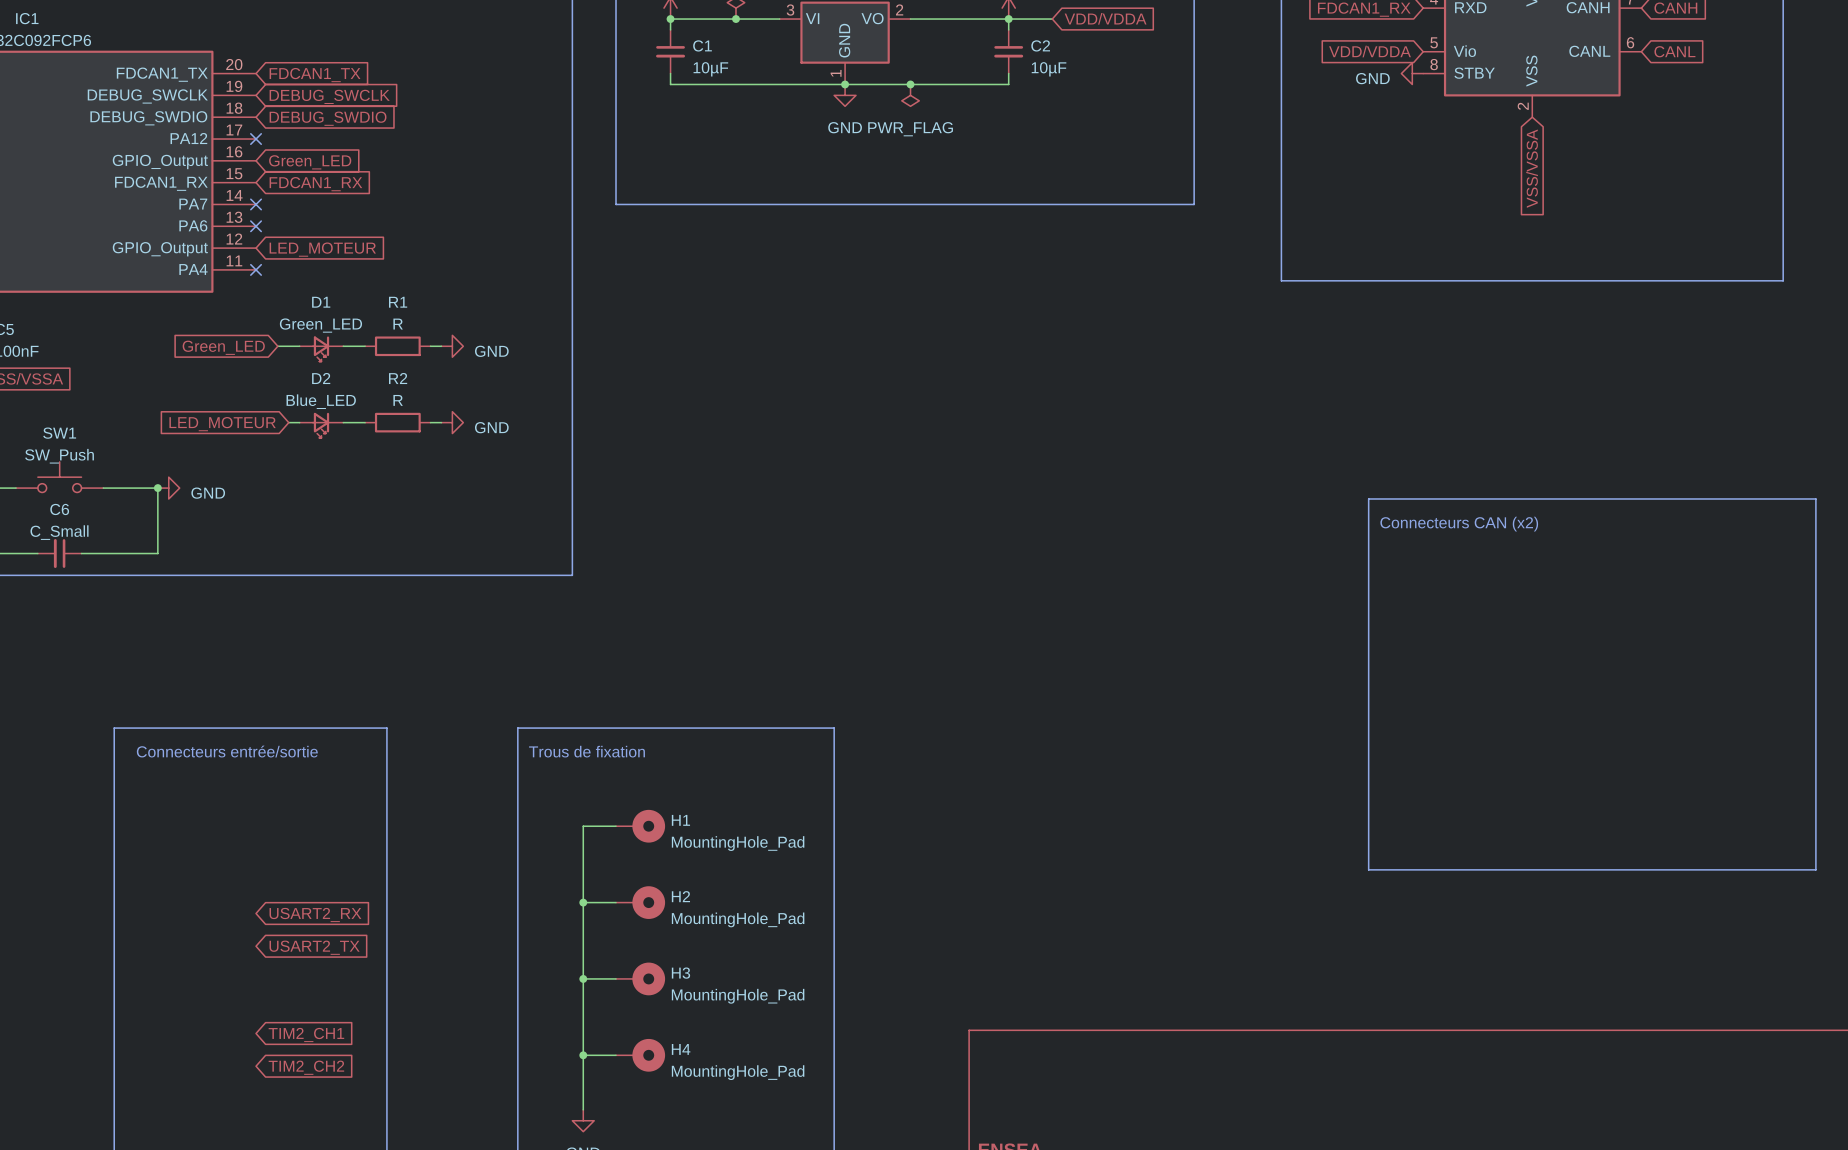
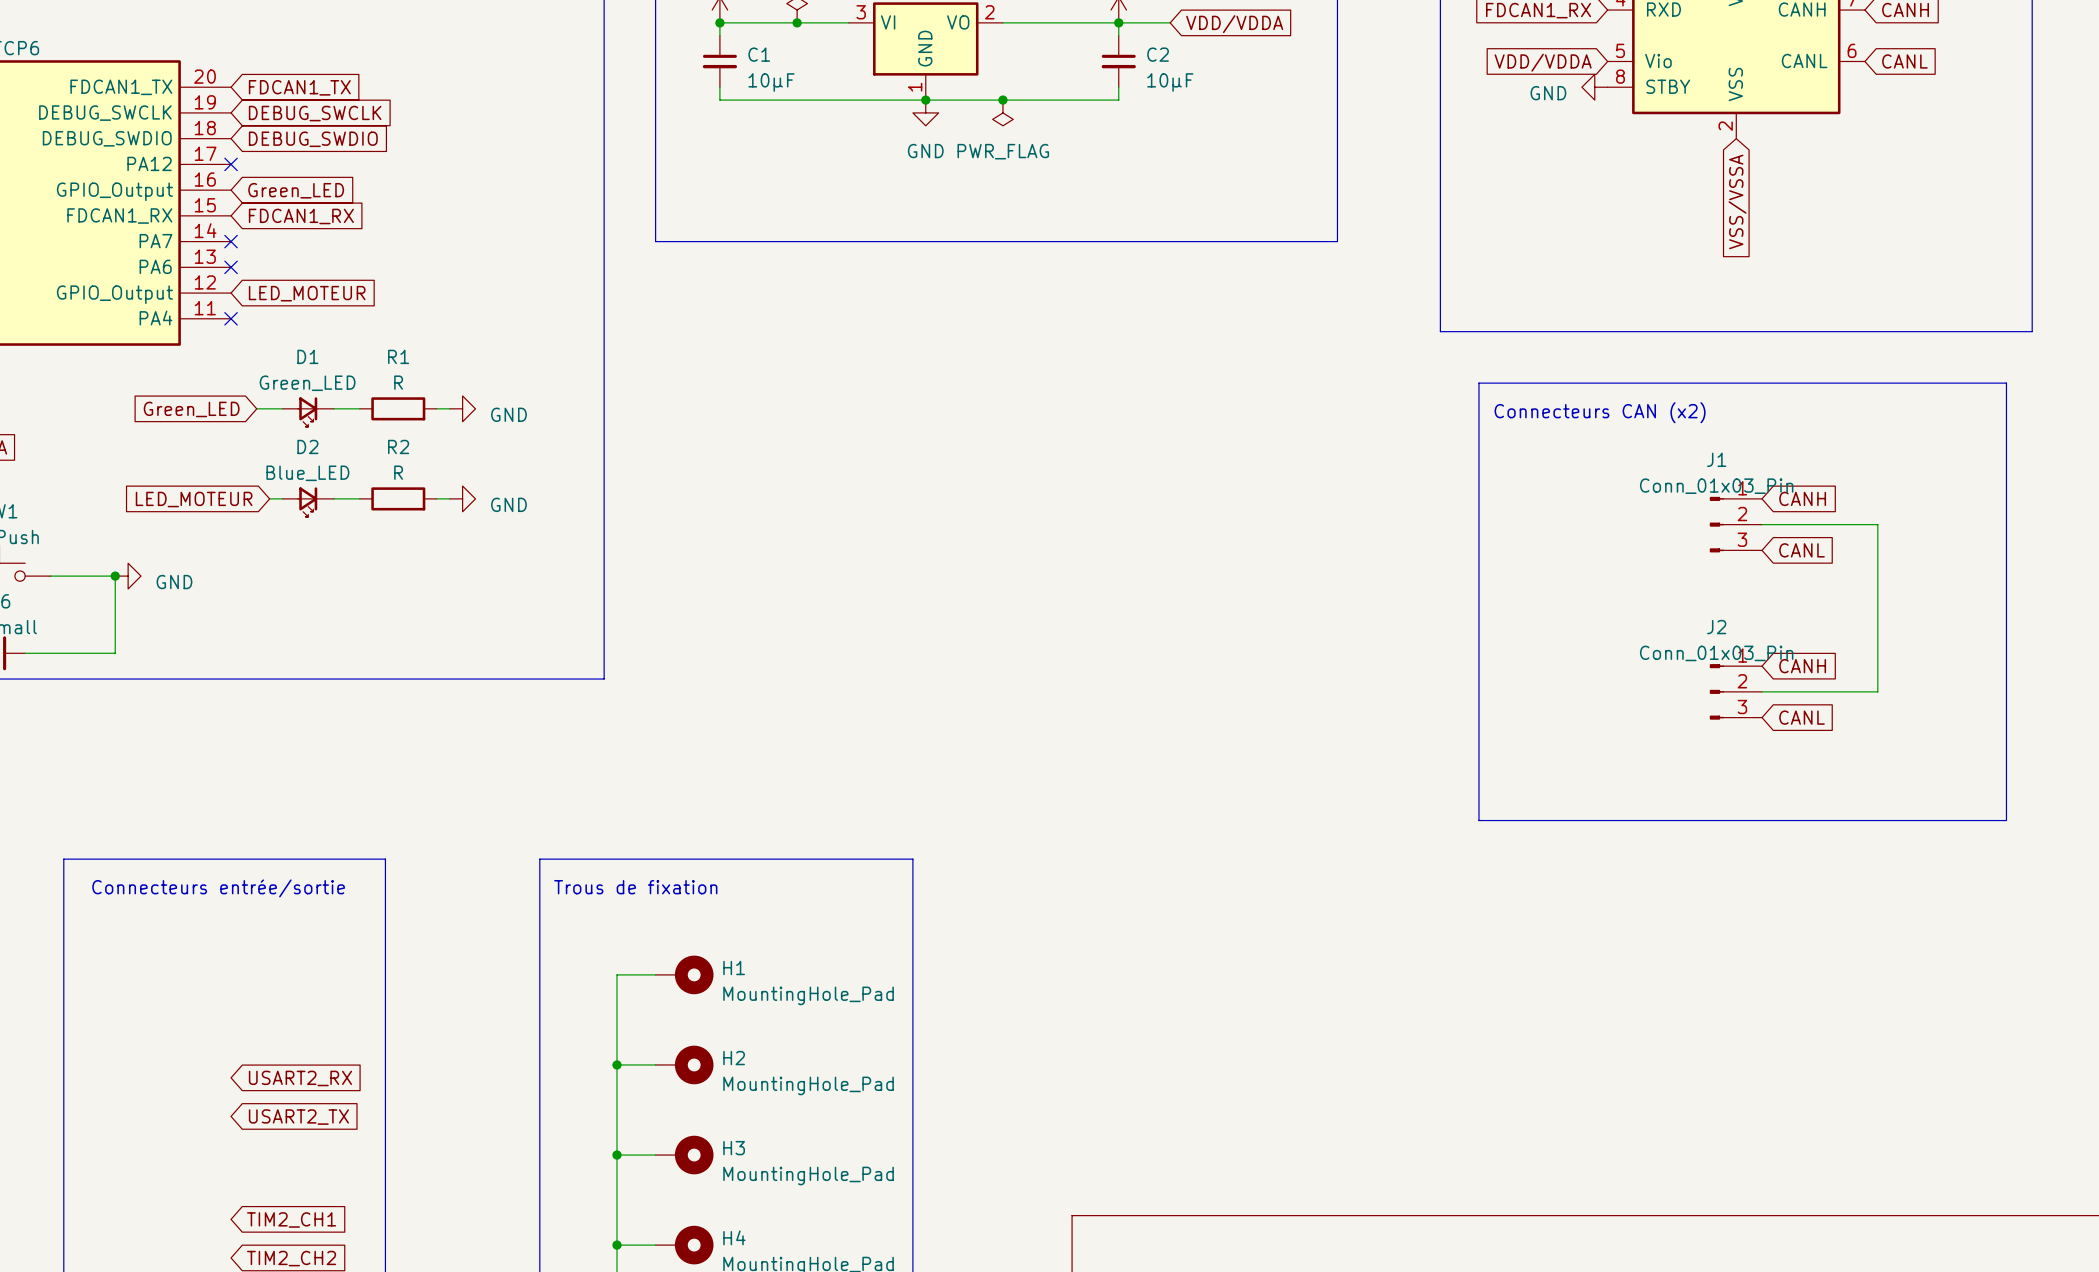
global label: none -> CANH (1802, 498)
J1: none -> Conn_01x03_Pin (1735, 524)
wire: none -> (1762, 524) (1877, 524) (1877, 691) (1762, 691)
global label: none -> CANL (1802, 550)
line: (1368, 498) (1815, 498) (1815, 869) (1368, 869) (1368, 498) -> (1478, 383) (2006, 383) (2006, 820) (1478, 820) (1478, 383)
text position: Connecteurs CAN (x2) (1459, 524) -> Connecteurs CAN (x2) (1600, 412)
global label: none -> CANH (1802, 666)
J2: none -> Conn_01x03_Pin (1735, 691)
global label: none -> CANL (1802, 717)

